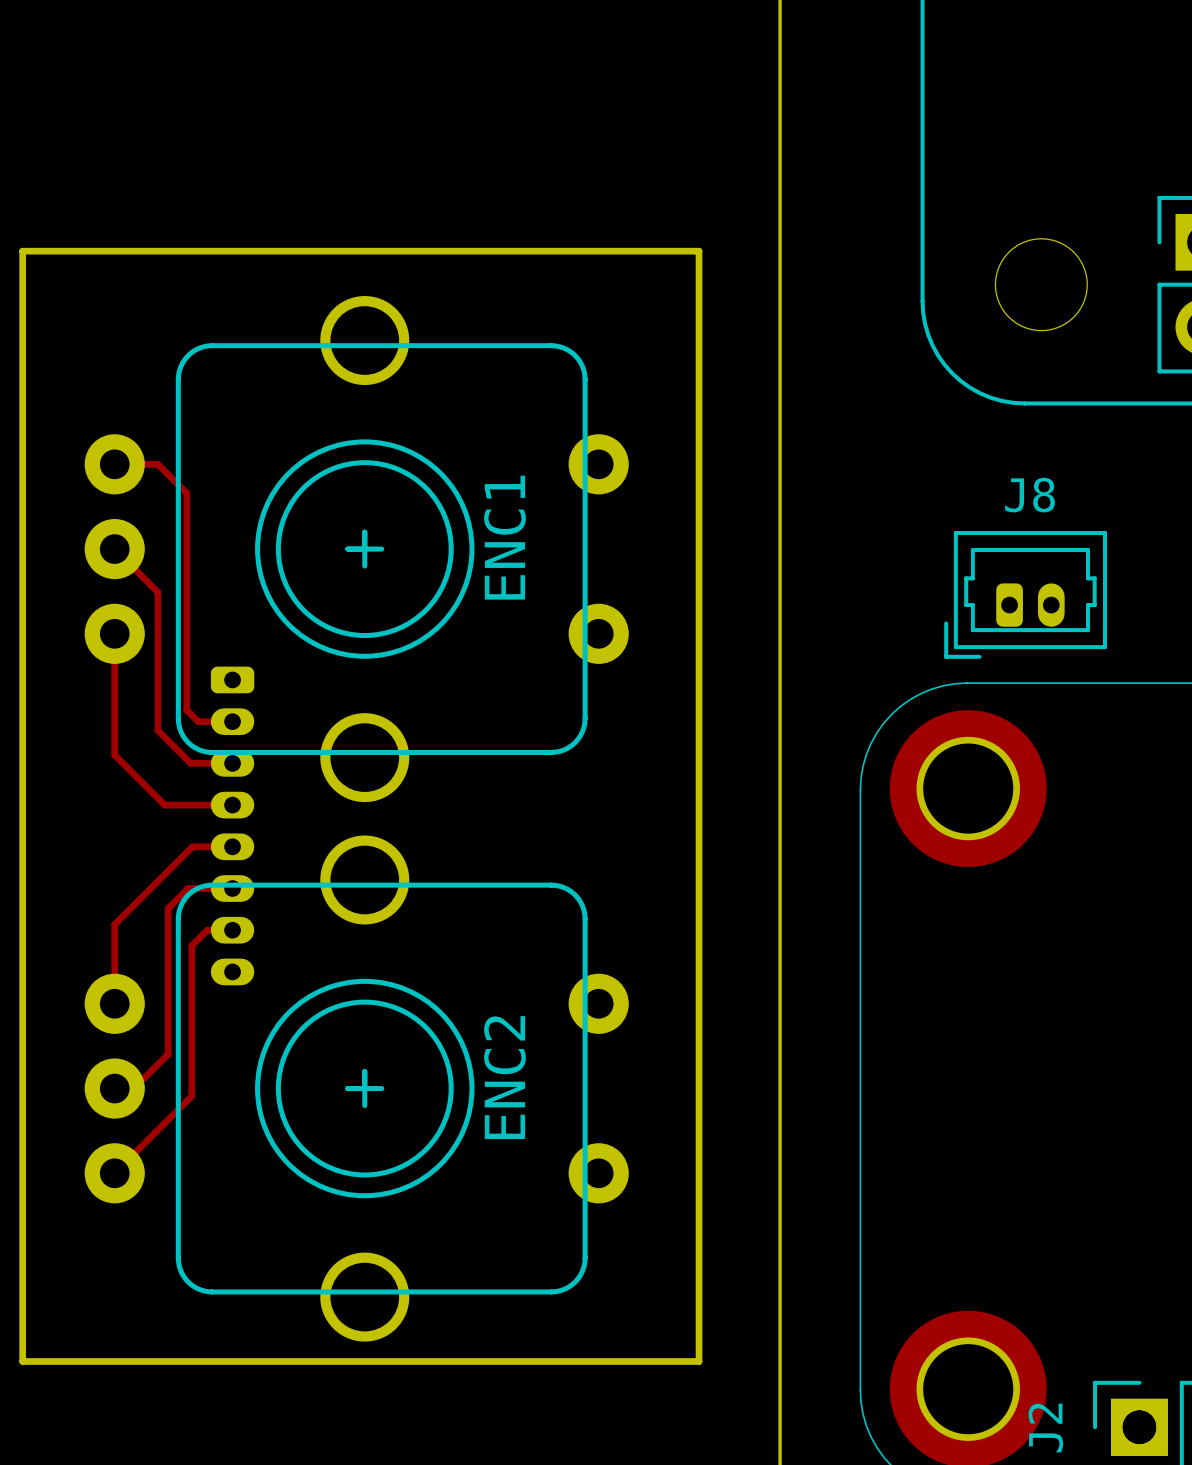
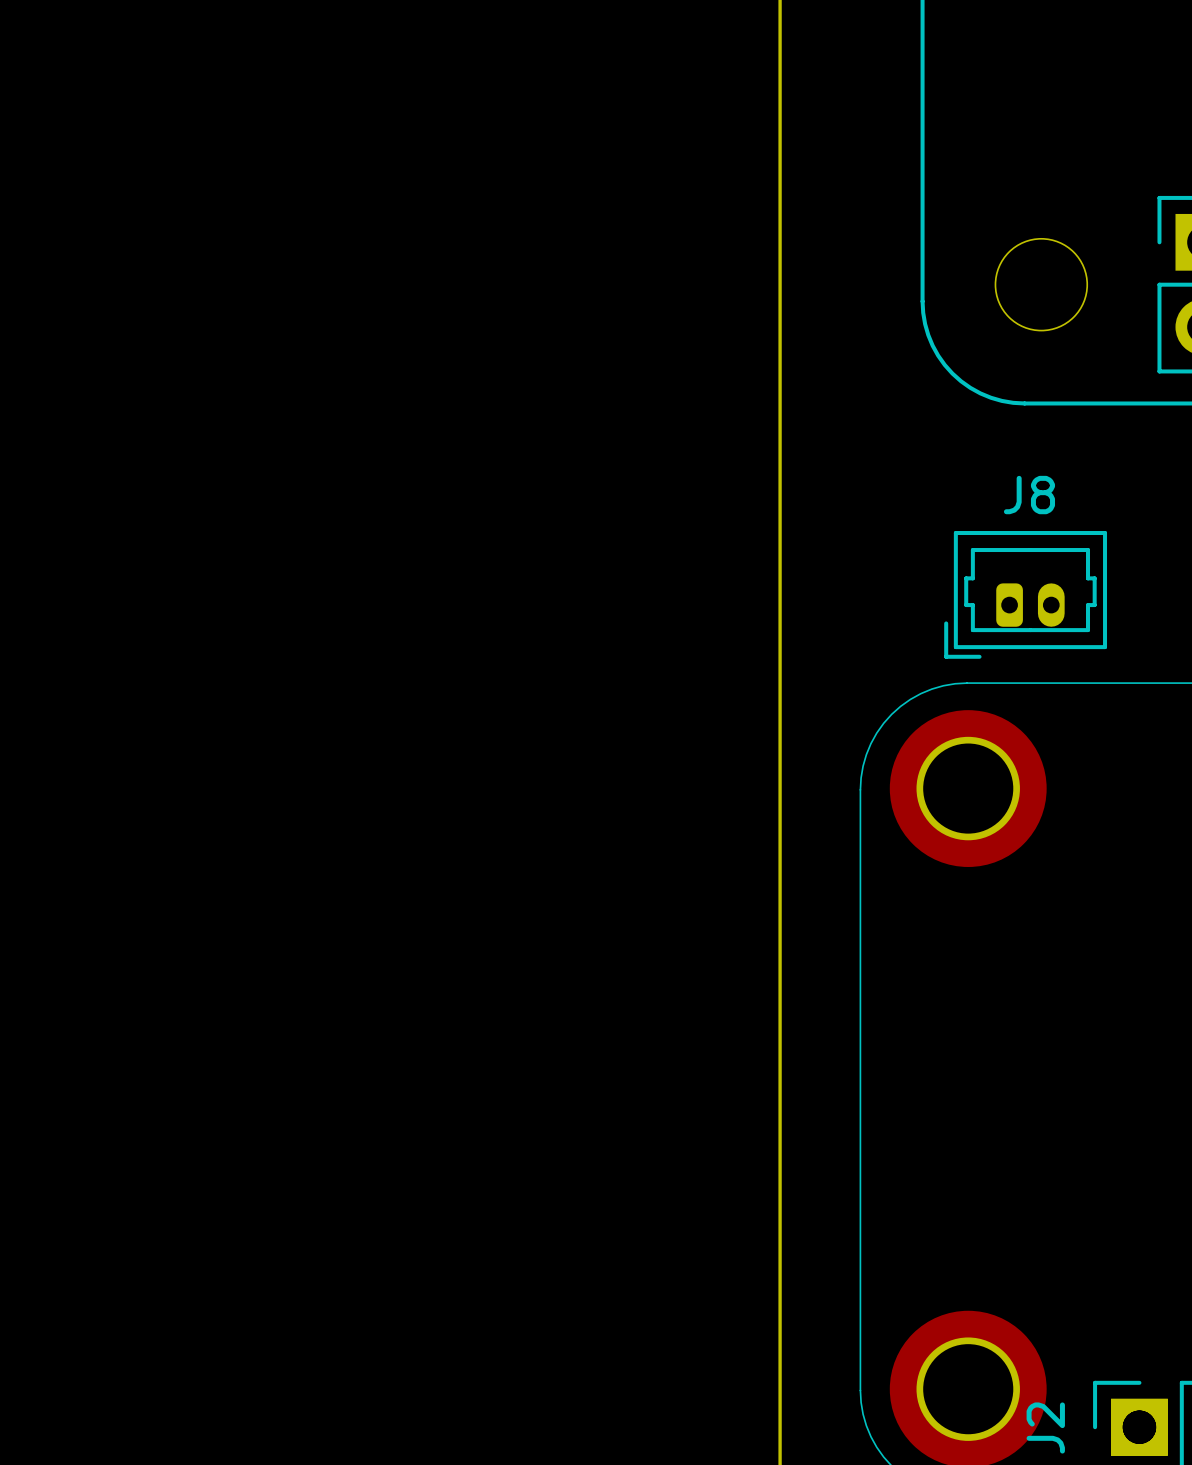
board edge: (22, 251) (699, 251) (699, 1361) (22, 1361) (22, 251) -> none
track: (114, 464) (157, 464) (186, 493) (186, 710) (198, 721) (232, 721) -> none
track: (114, 549) (157, 592) (157, 730) (190, 763) (232, 763) -> none
ENC1: (356, 549) -> none
track: (114, 633) (114, 755) (164, 805) (232, 805) -> none
part: (232, 825) -> none
track: (232, 846) (192, 846) (114, 924) (114, 1003) -> none
track: (232, 888) (188, 888) (168, 908) (168, 1054) (133, 1088) -> none
track: (232, 930) (207, 930) (191, 945) (191, 1096) (114, 1173) -> none
ENC2: (356, 1088) -> none

